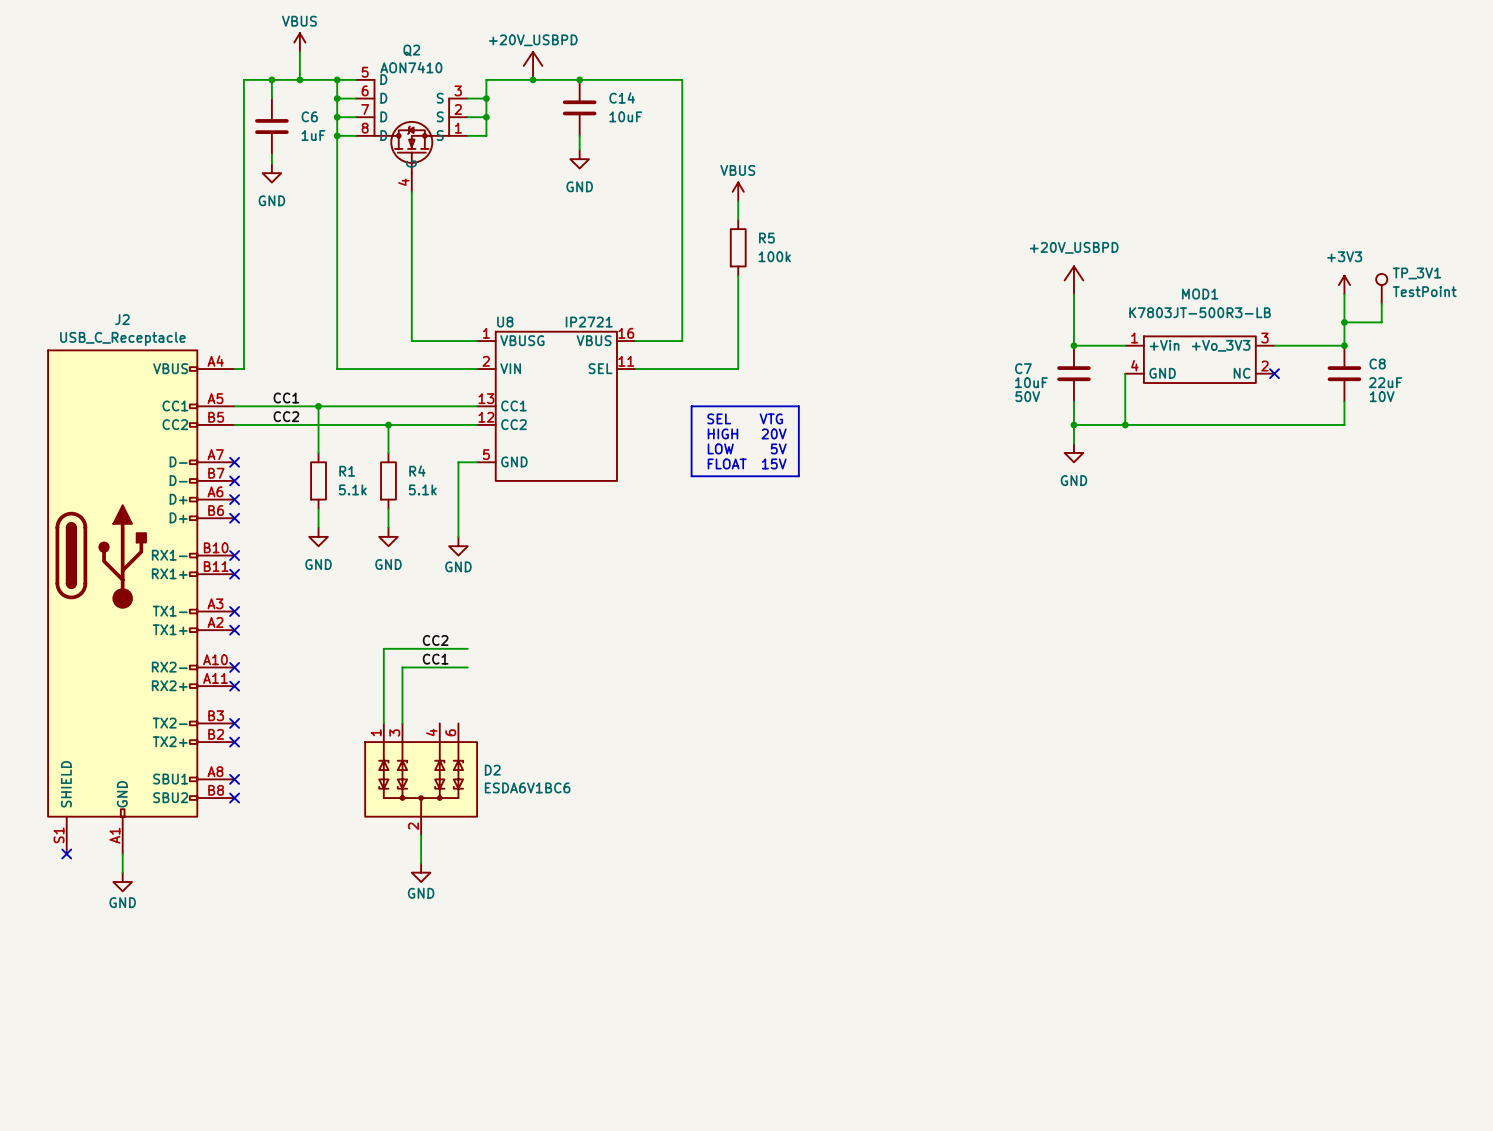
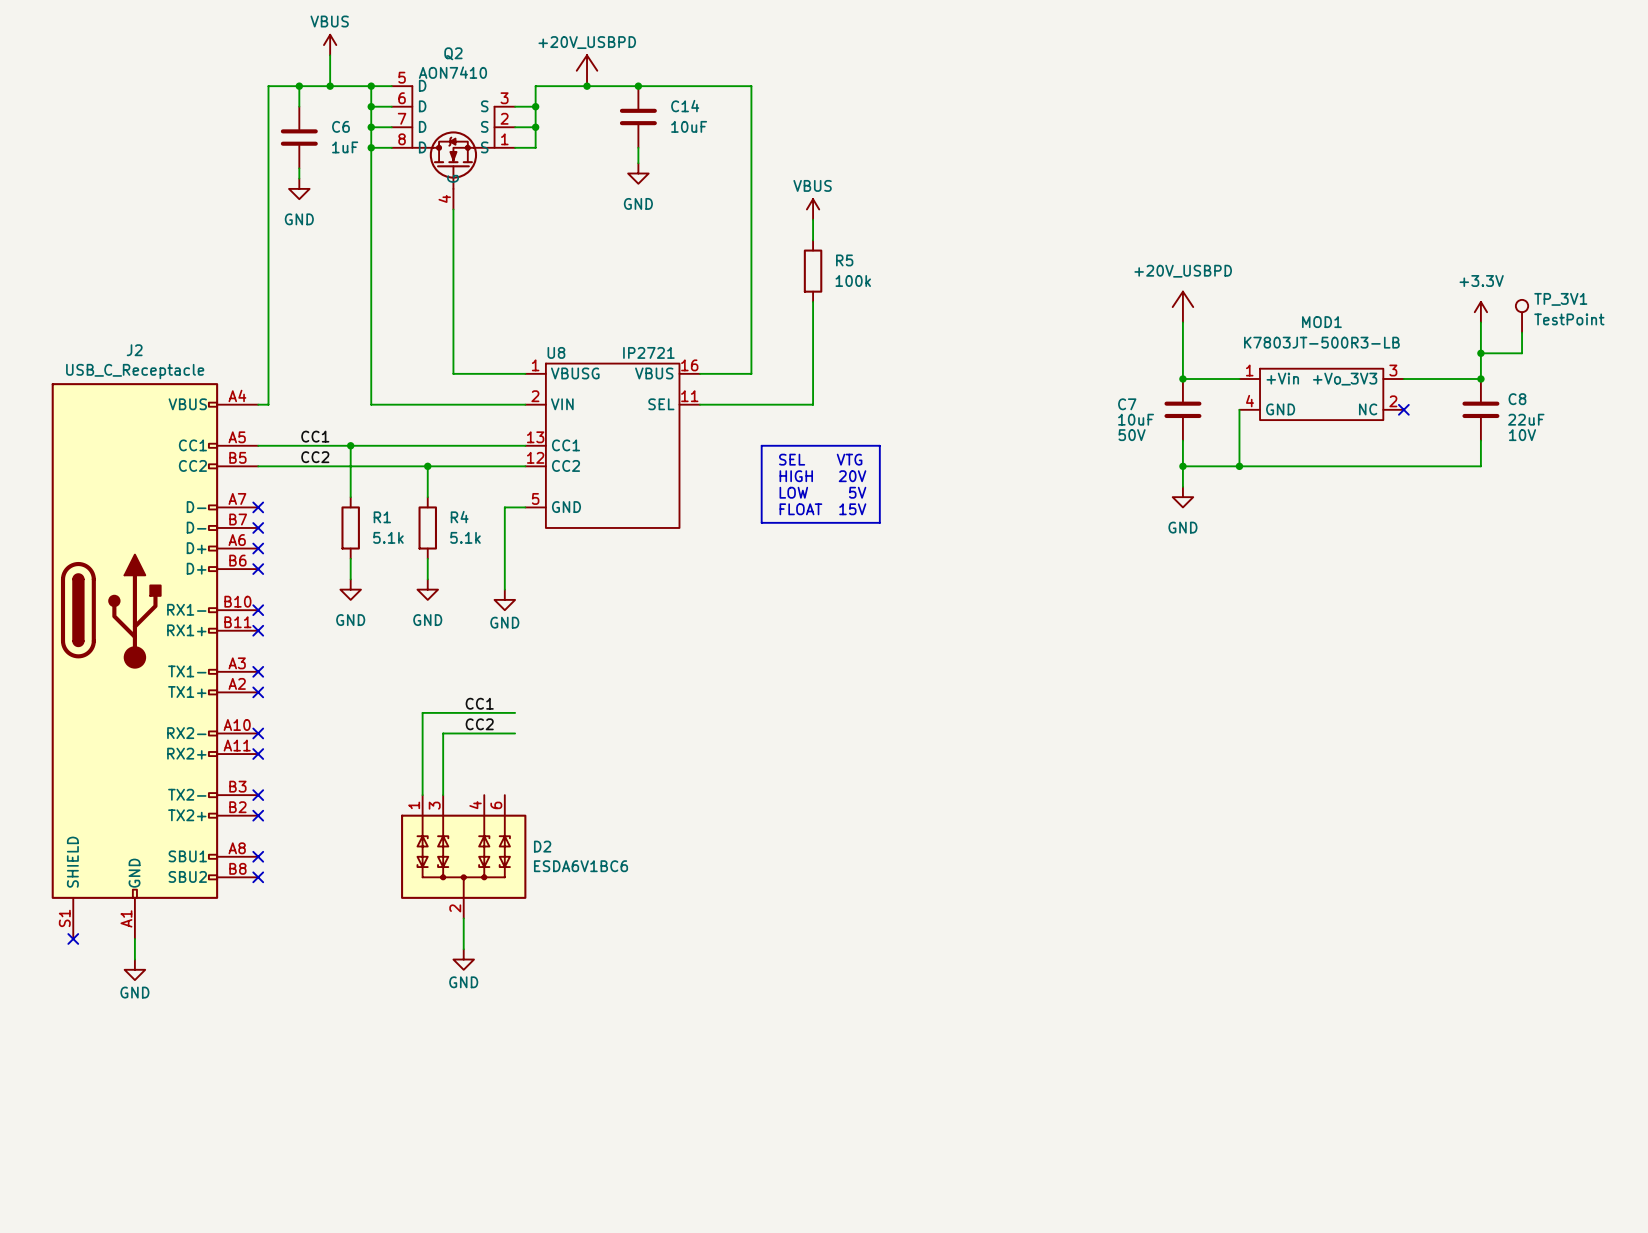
power symbol: +3V3 (1344, 285) -> +3.3V (1480, 312)
label: CC2 (435, 640) -> CC1 (479, 703)
label: CC1 (435, 659) -> CC2 (479, 724)

